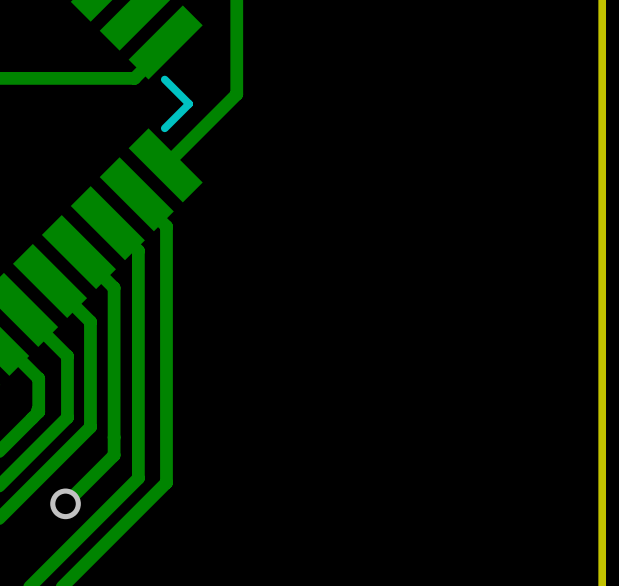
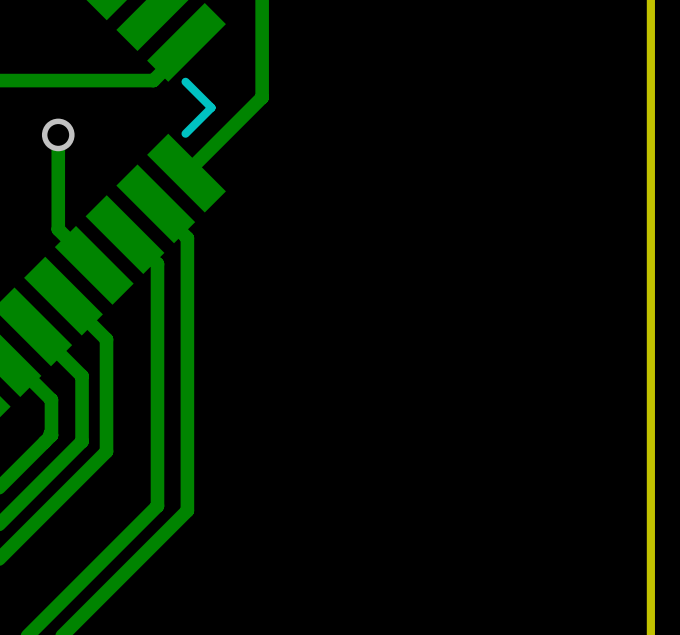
via: none -> (58, 134)
track: (78, 252) (114, 287) (114, 455) (65, 503) -> (94, 265) (58, 229) (58, 134)
via: (65, 503) -> none

